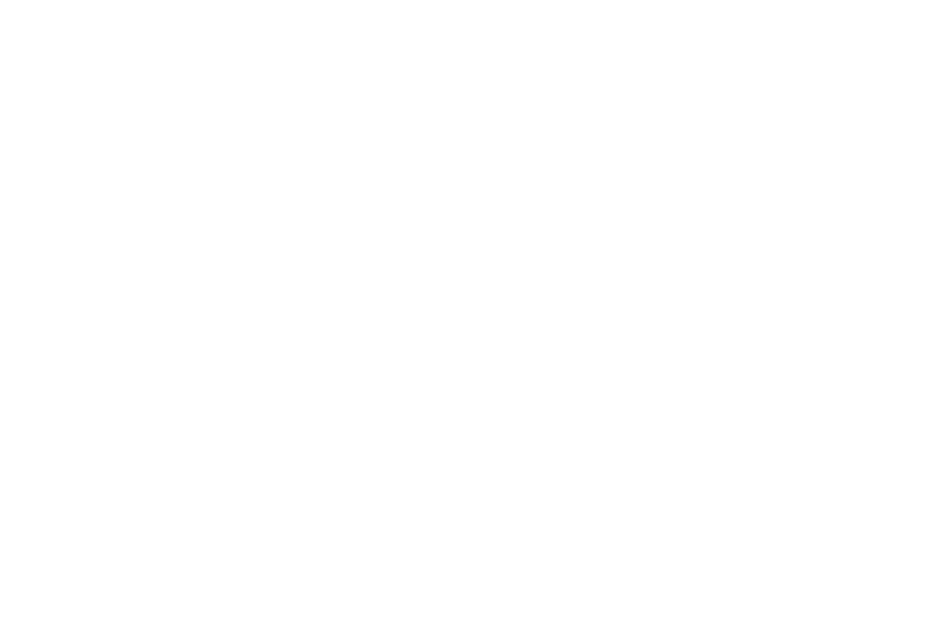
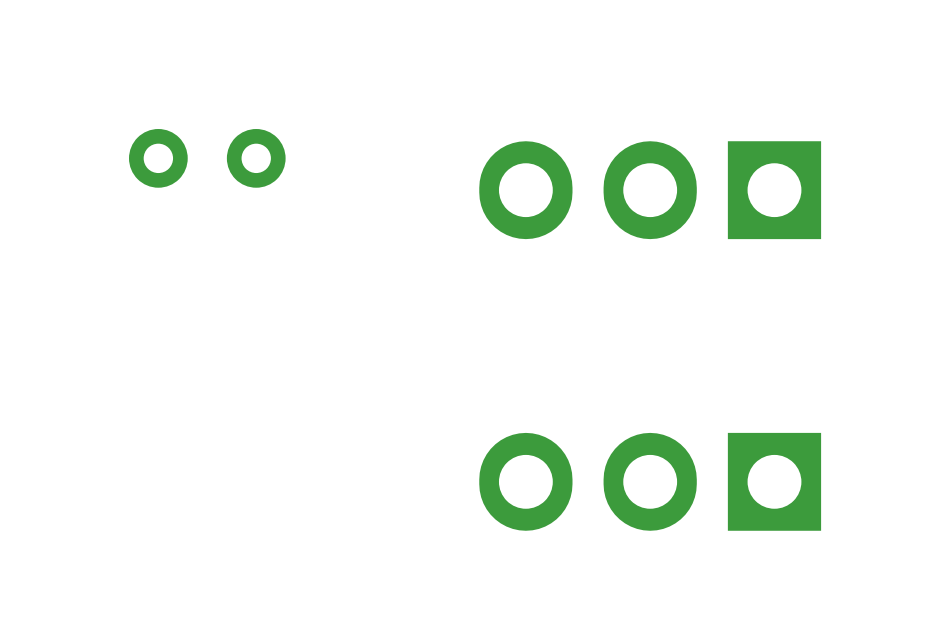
part: none -> (207, 158)
part: none -> (650, 190)
part: none -> (650, 481)

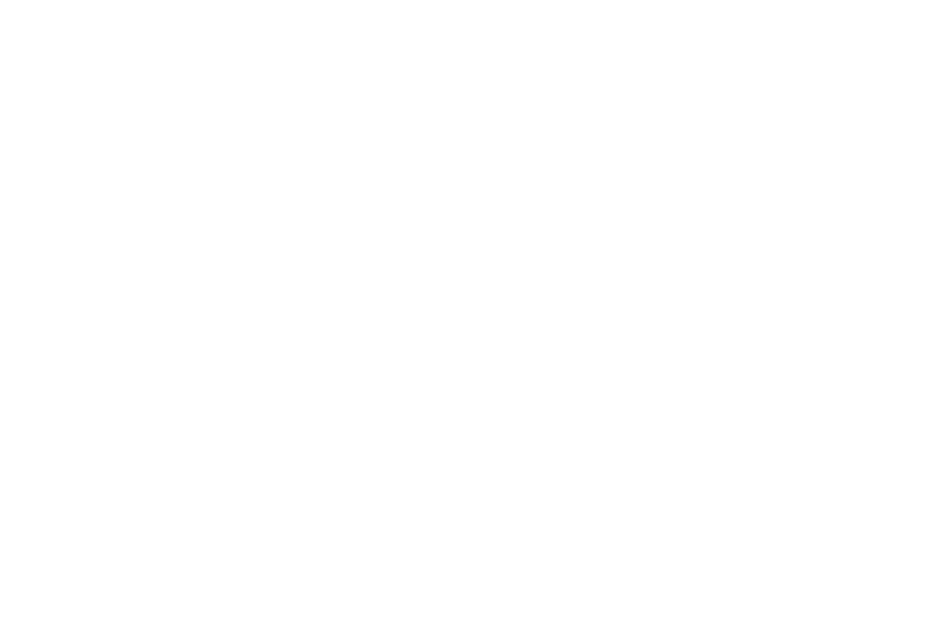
part: (207, 158) -> none
part: (650, 190) -> none
part: (650, 481) -> none

